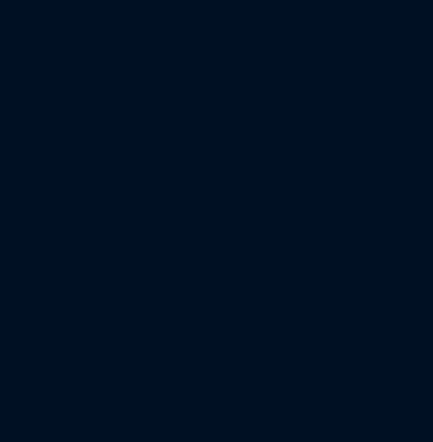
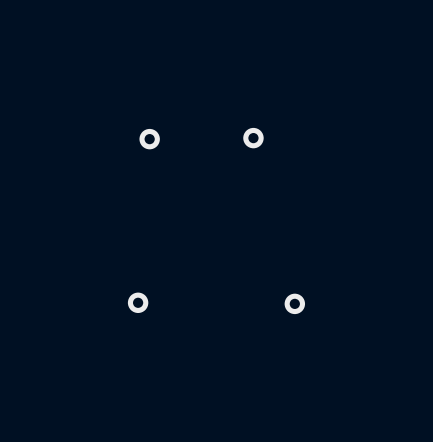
via: none -> (253, 138)
via: none -> (149, 139)
via: none -> (138, 302)
via: none -> (294, 303)

